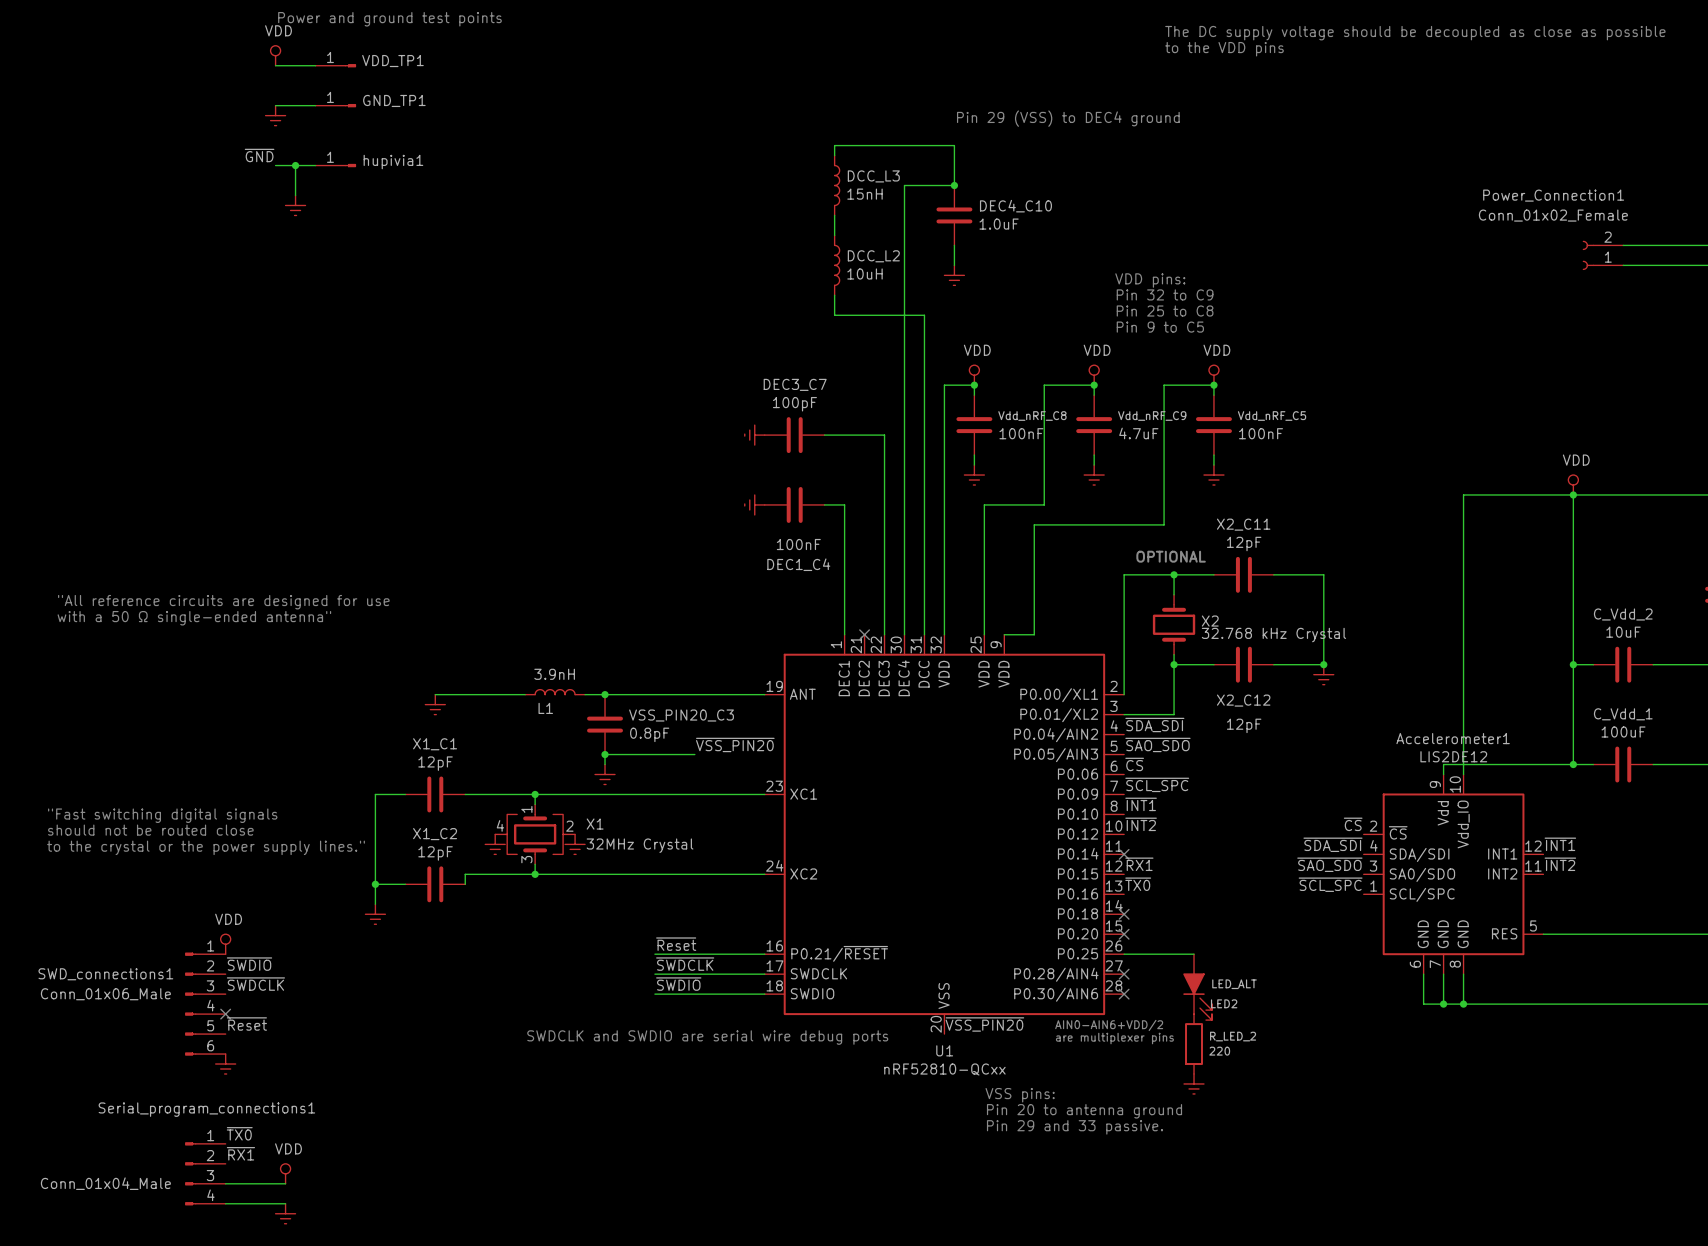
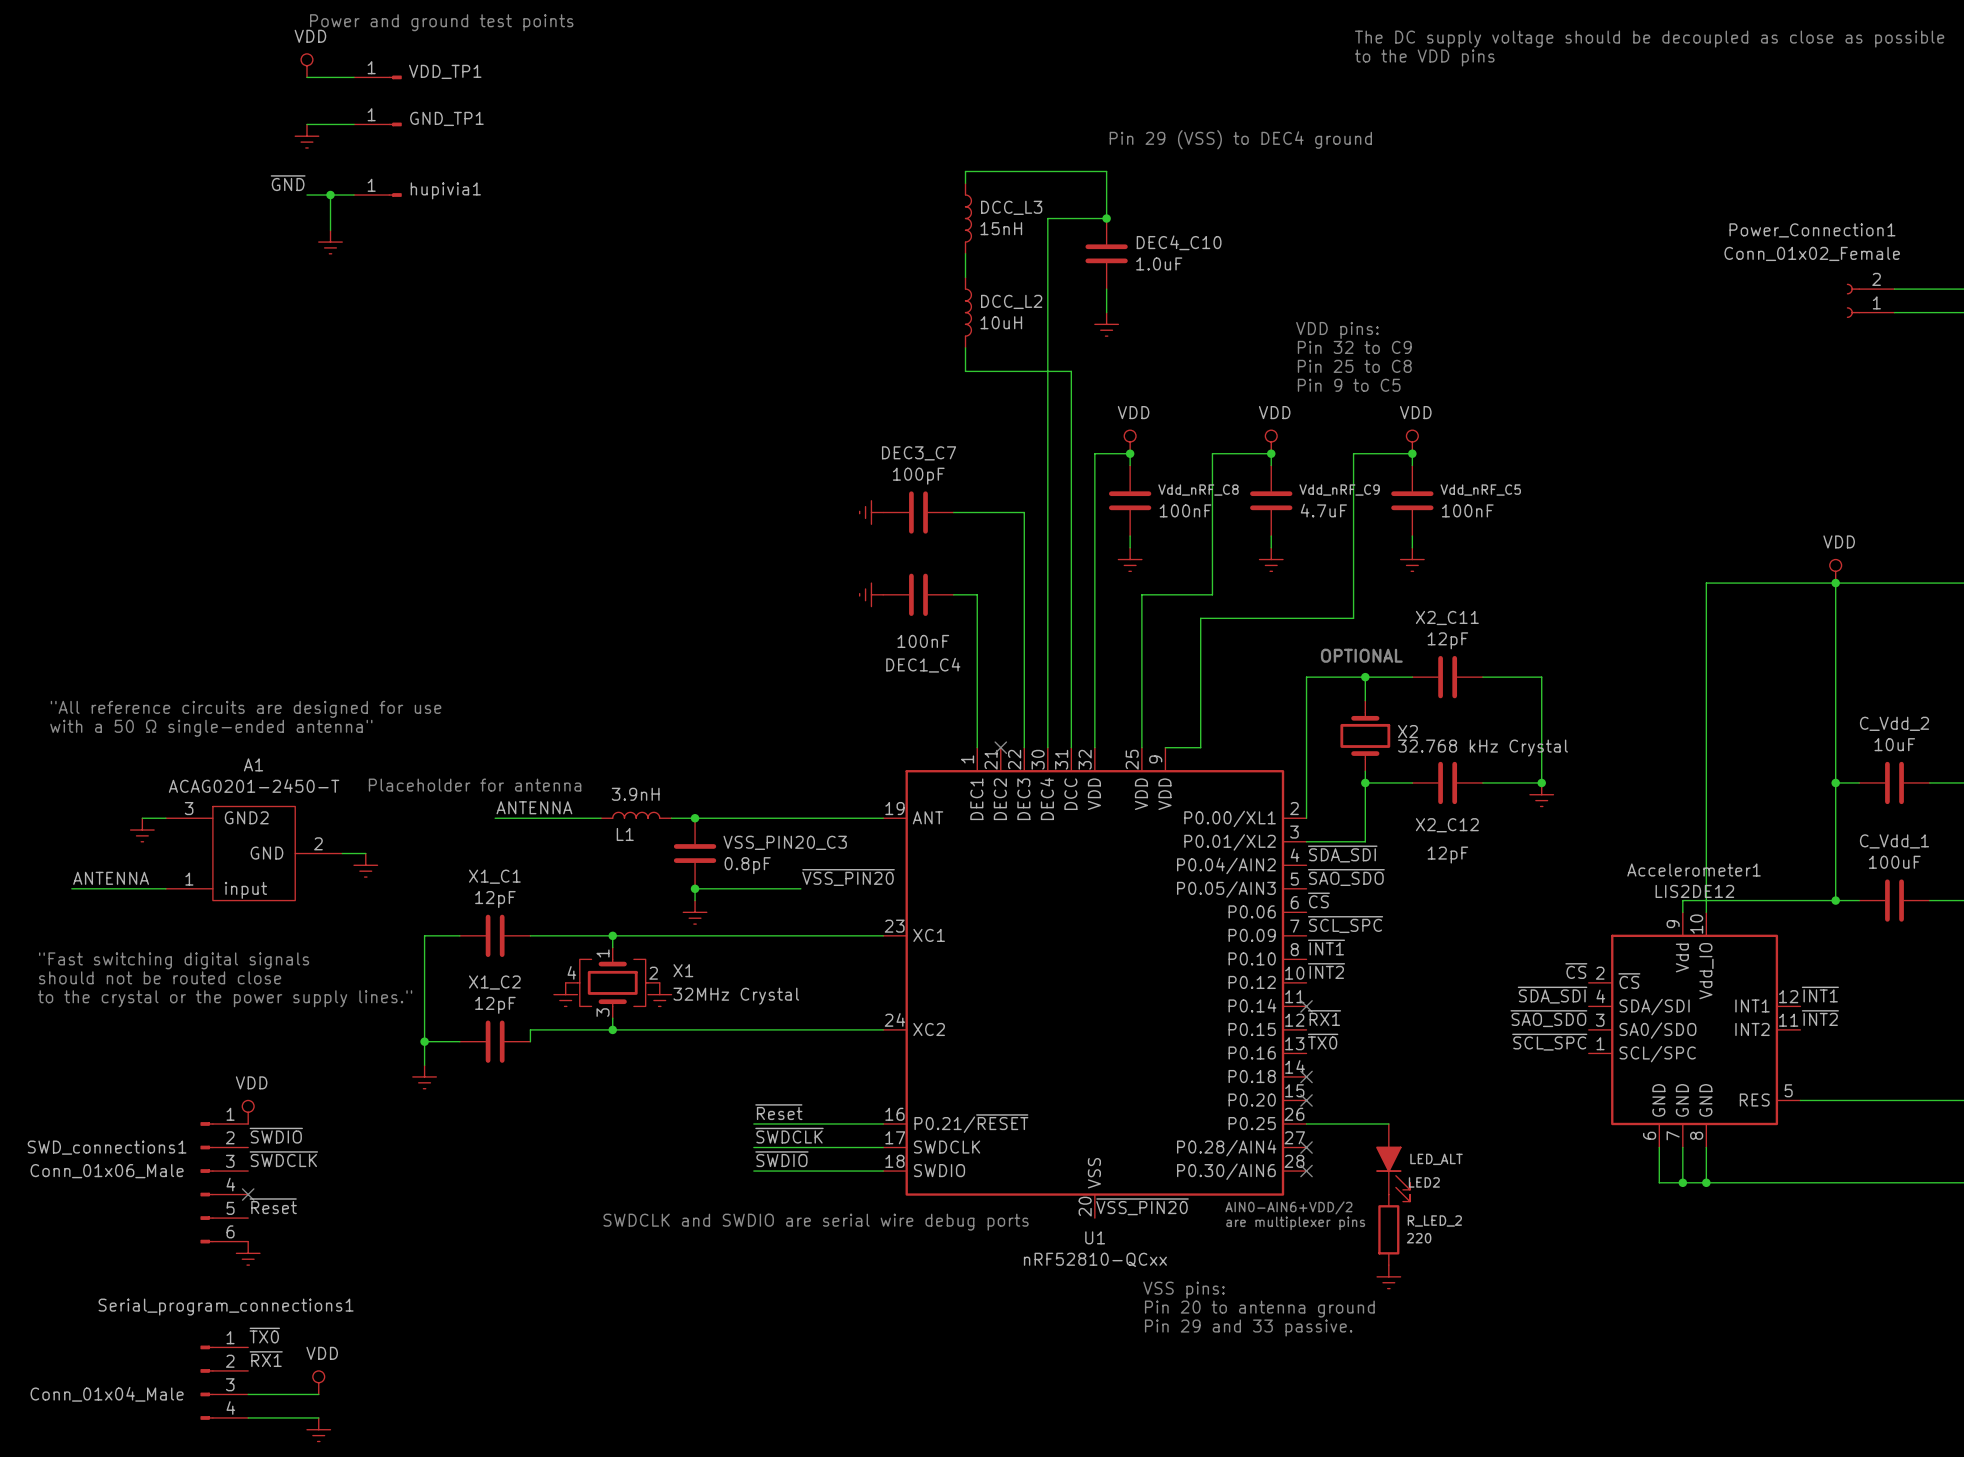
text: none -> Placeholder for antenna (475, 785)
label: none -> ANTENNA (534, 807)
wire: none -> (142, 818) (165, 818)
power symbol: none -> (142, 830)
power symbol position: (435, 704) -> (365, 865)
A1: none -> ACAG0201-2450-T (254, 853)
wire: none -> (342, 853) (365, 853)
label: none -> ANTENNA (111, 878)
wire: none -> (71, 888) (165, 888)

